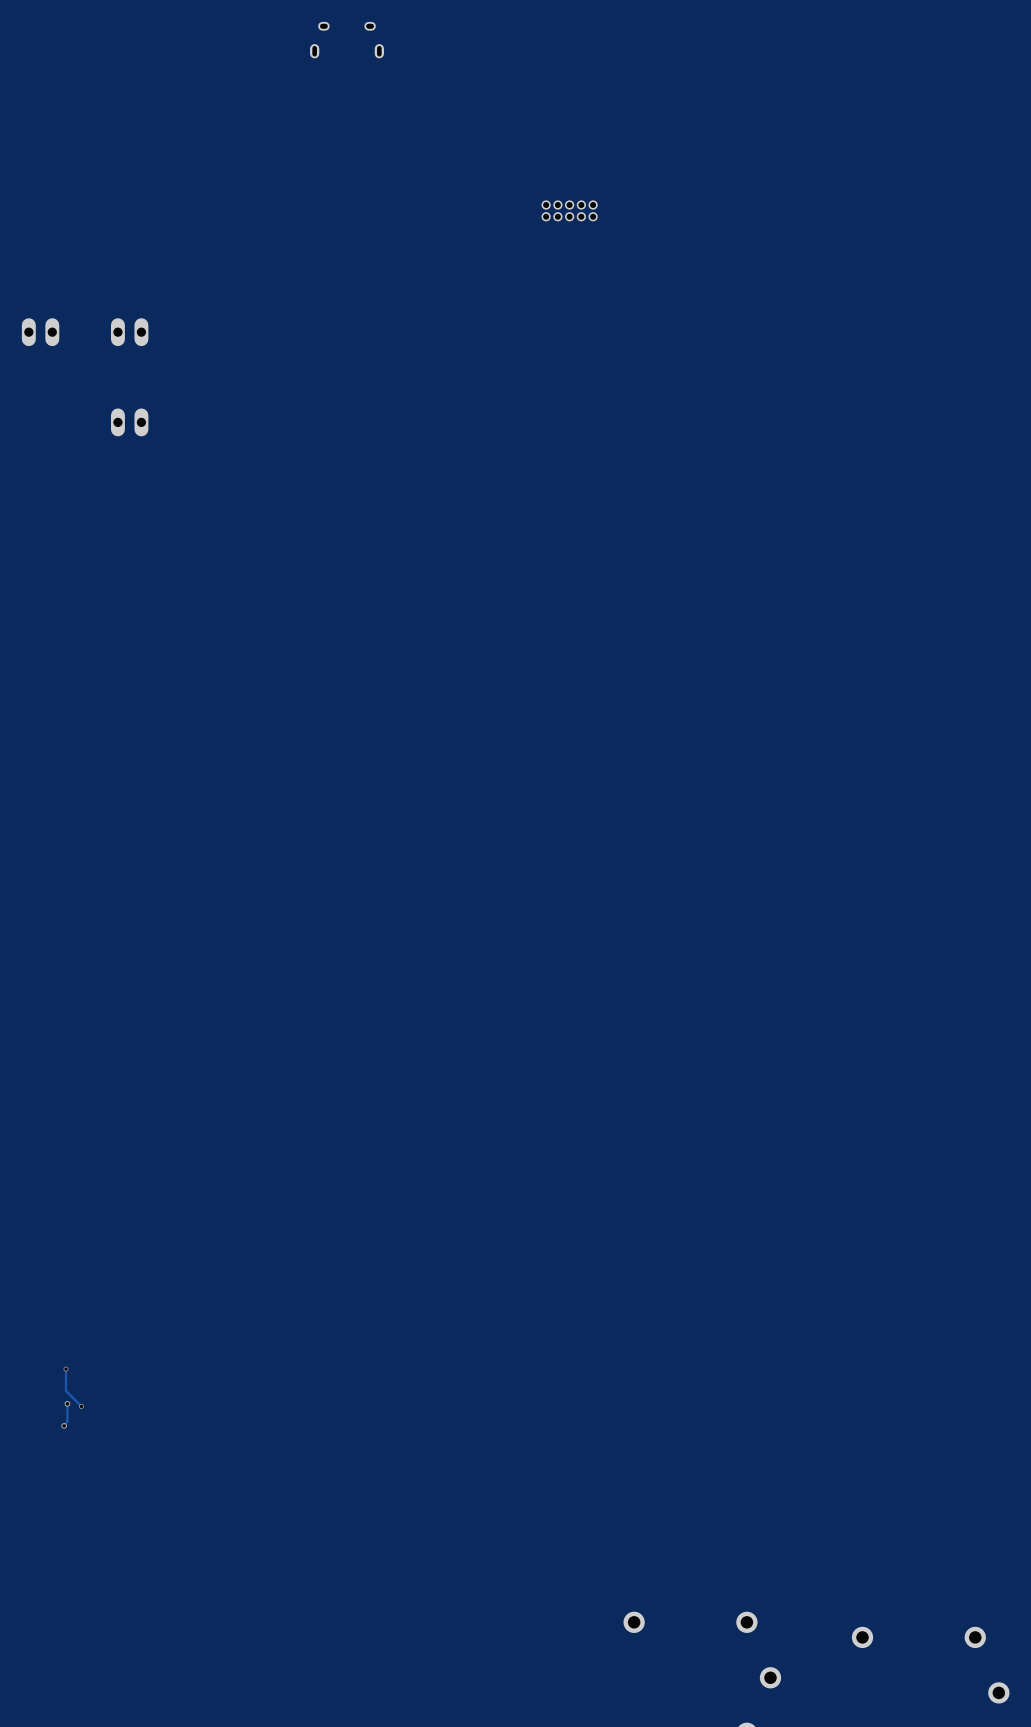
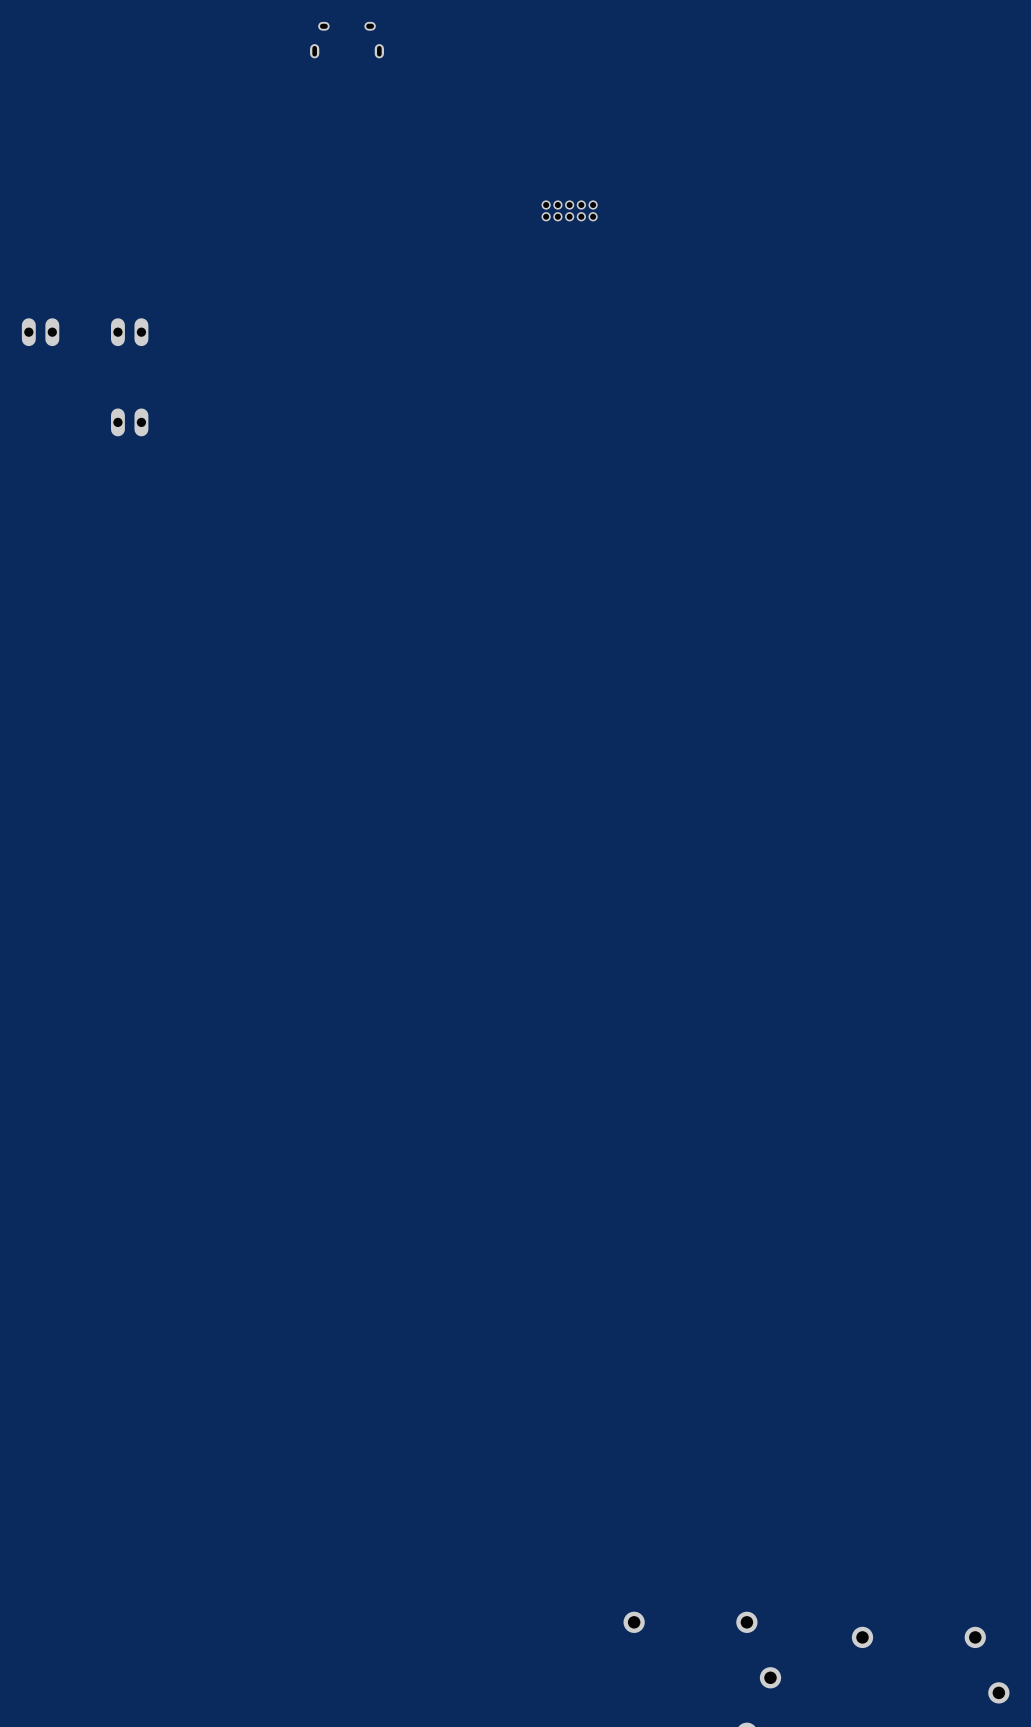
track: (66, 1369) (66, 1390) (81, 1406) -> none
via: (66, 1369) -> none
track: (67, 1403) (67, 1421) (64, 1425) -> none
via: (67, 1403) -> none
via: (81, 1406) -> none
via: (64, 1425) -> none

